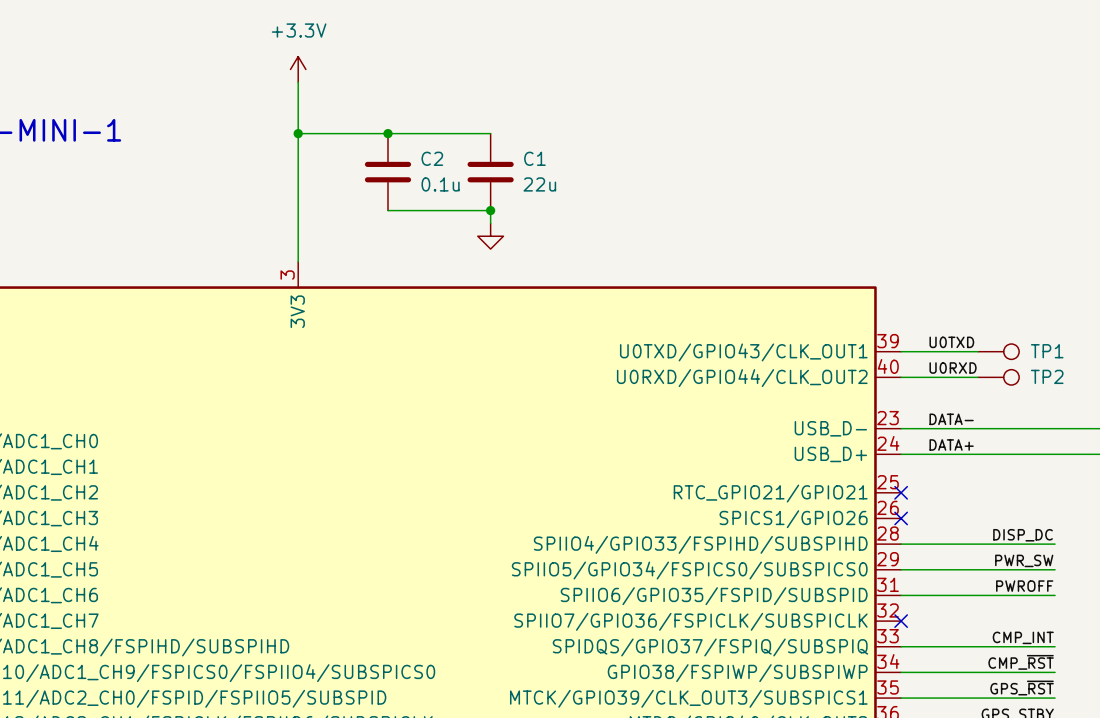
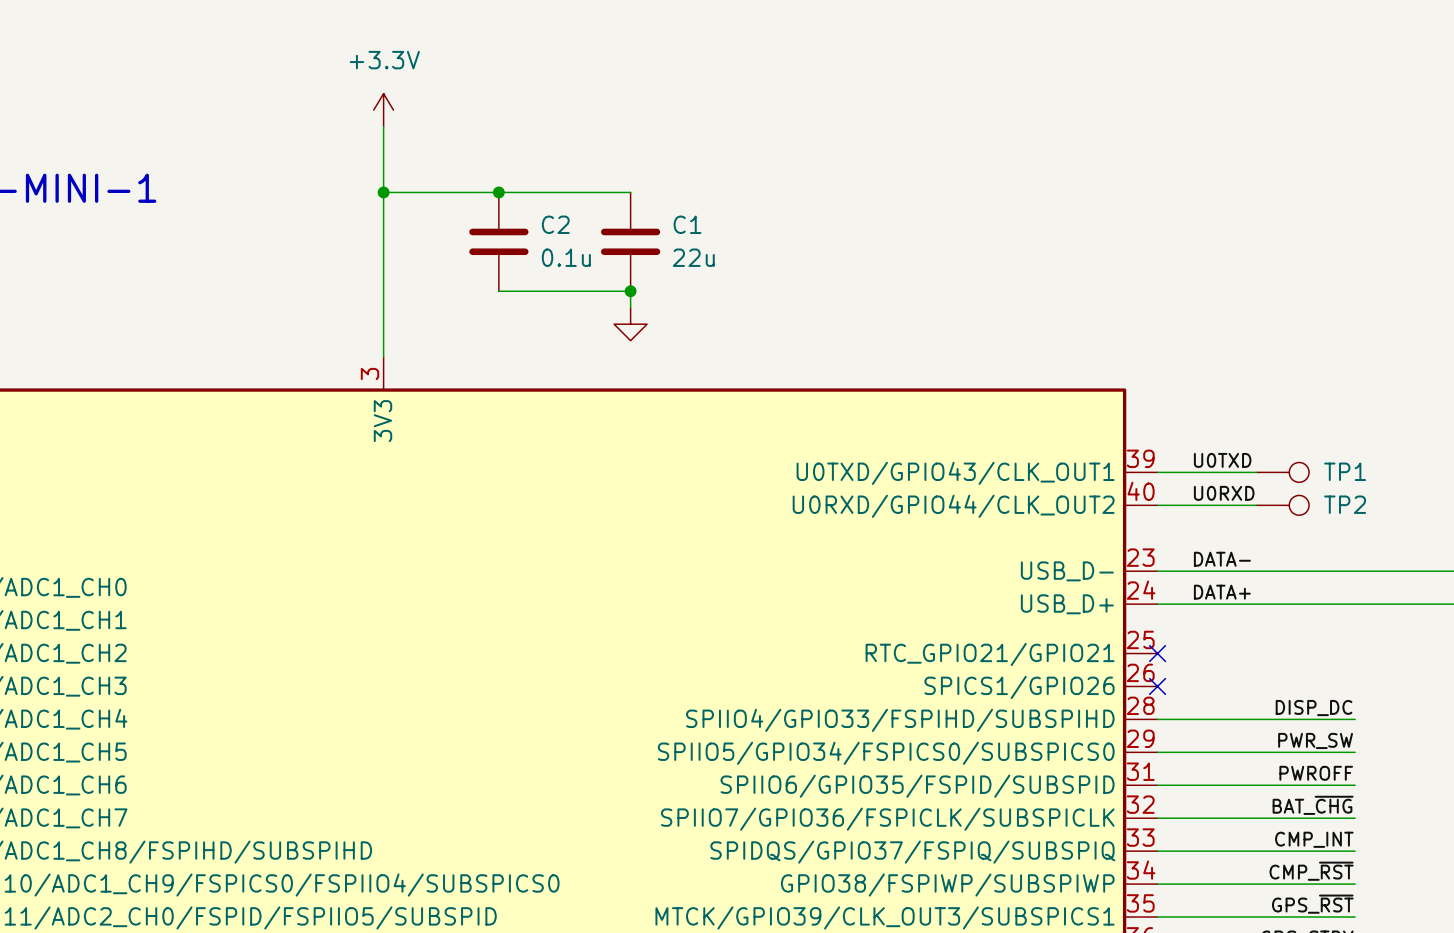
label: none -> BAT_~{CHG} (1313, 805)
wire: none -> (1157, 818) (1355, 818)
no-connect mark: (901, 621) -> none

